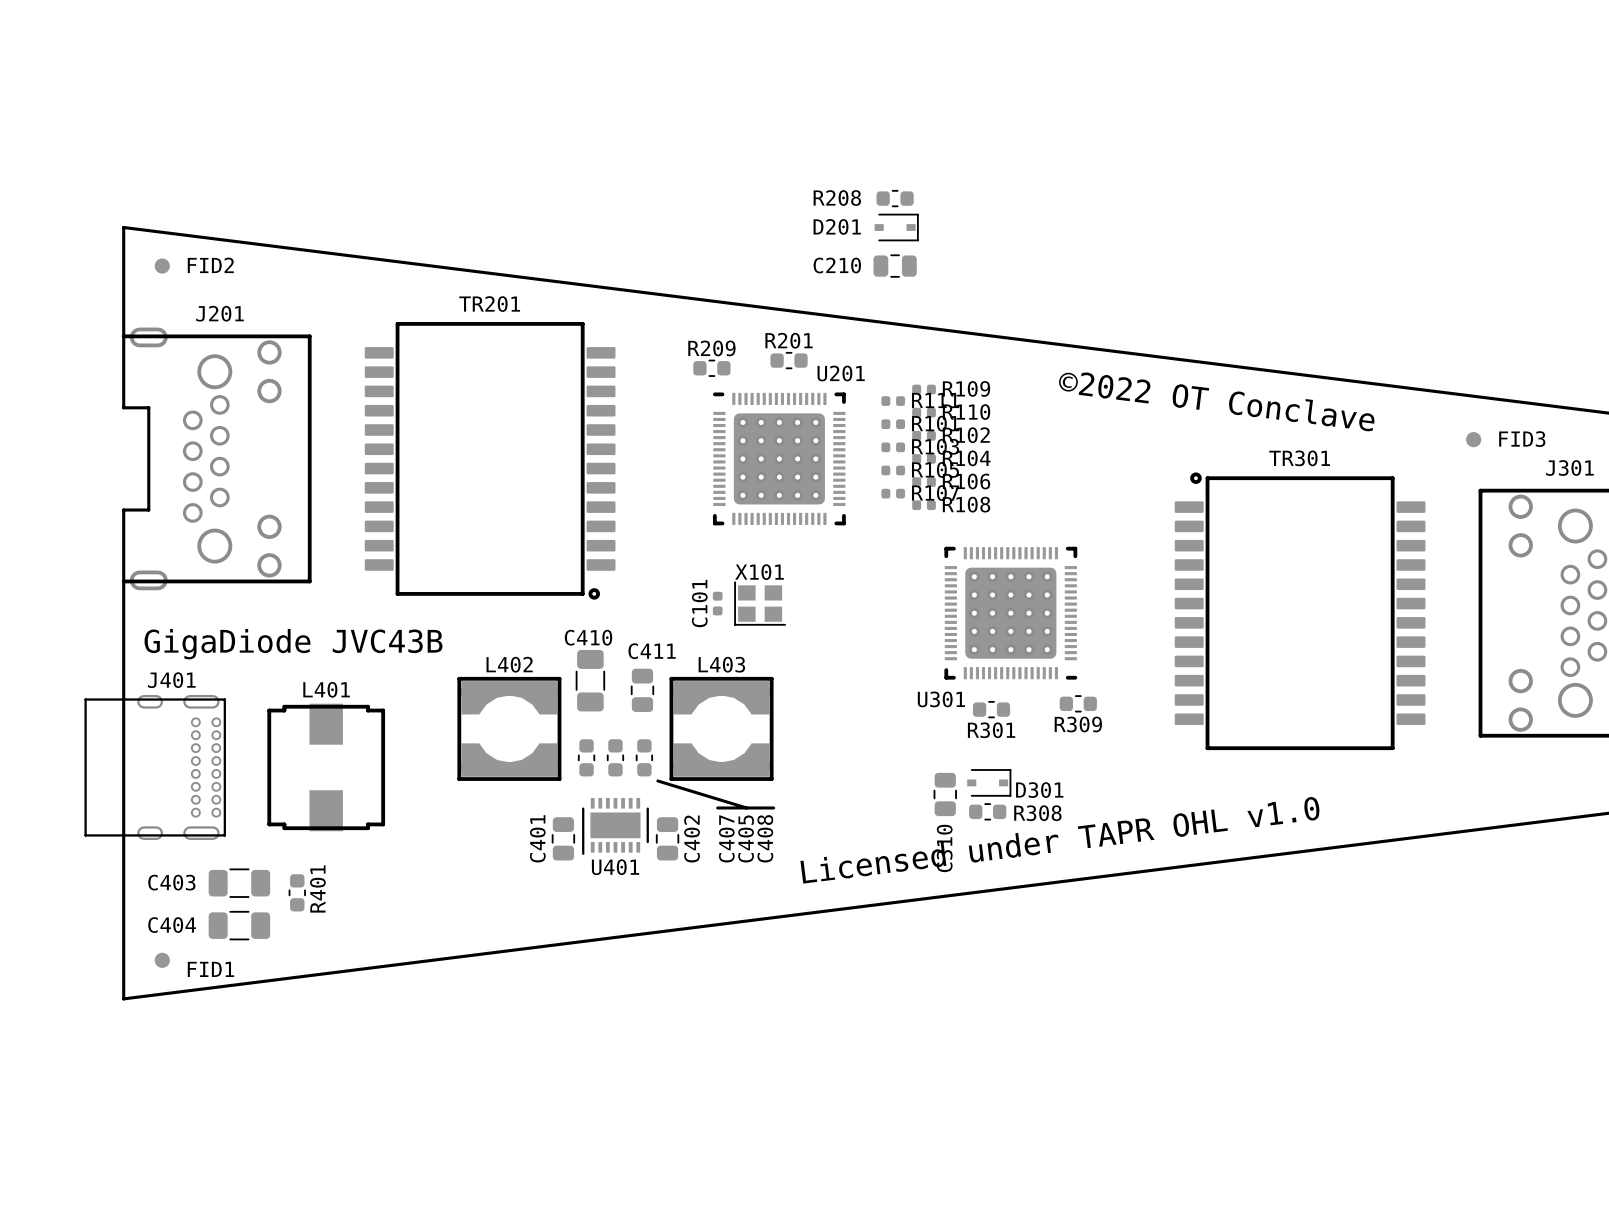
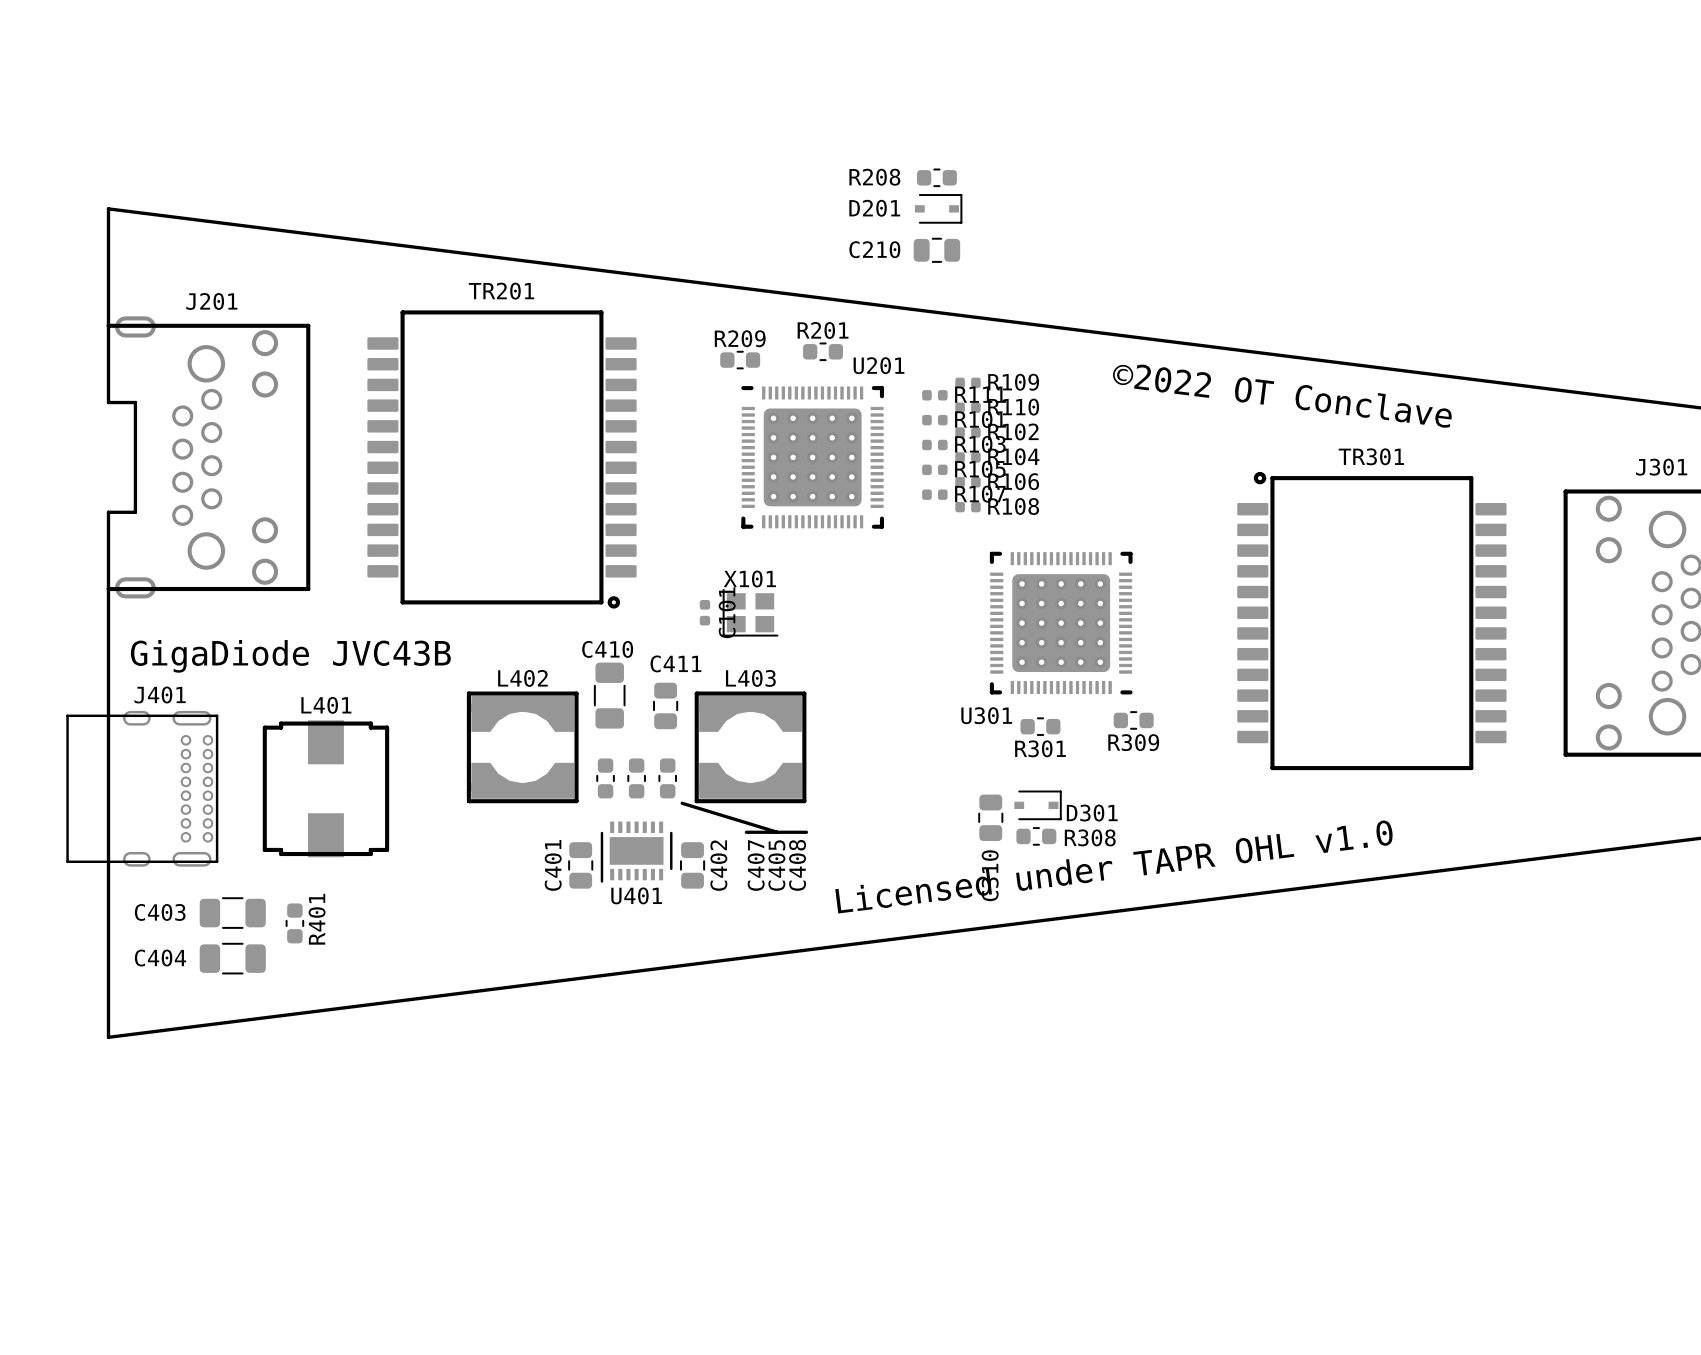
FID2: (162, 266) -> none
FID3: (1473, 439) -> none
C101 position: (717, 603) -> (704, 612)
X101 position: (760, 603) -> (750, 612)
FID1: (162, 960) -> none

